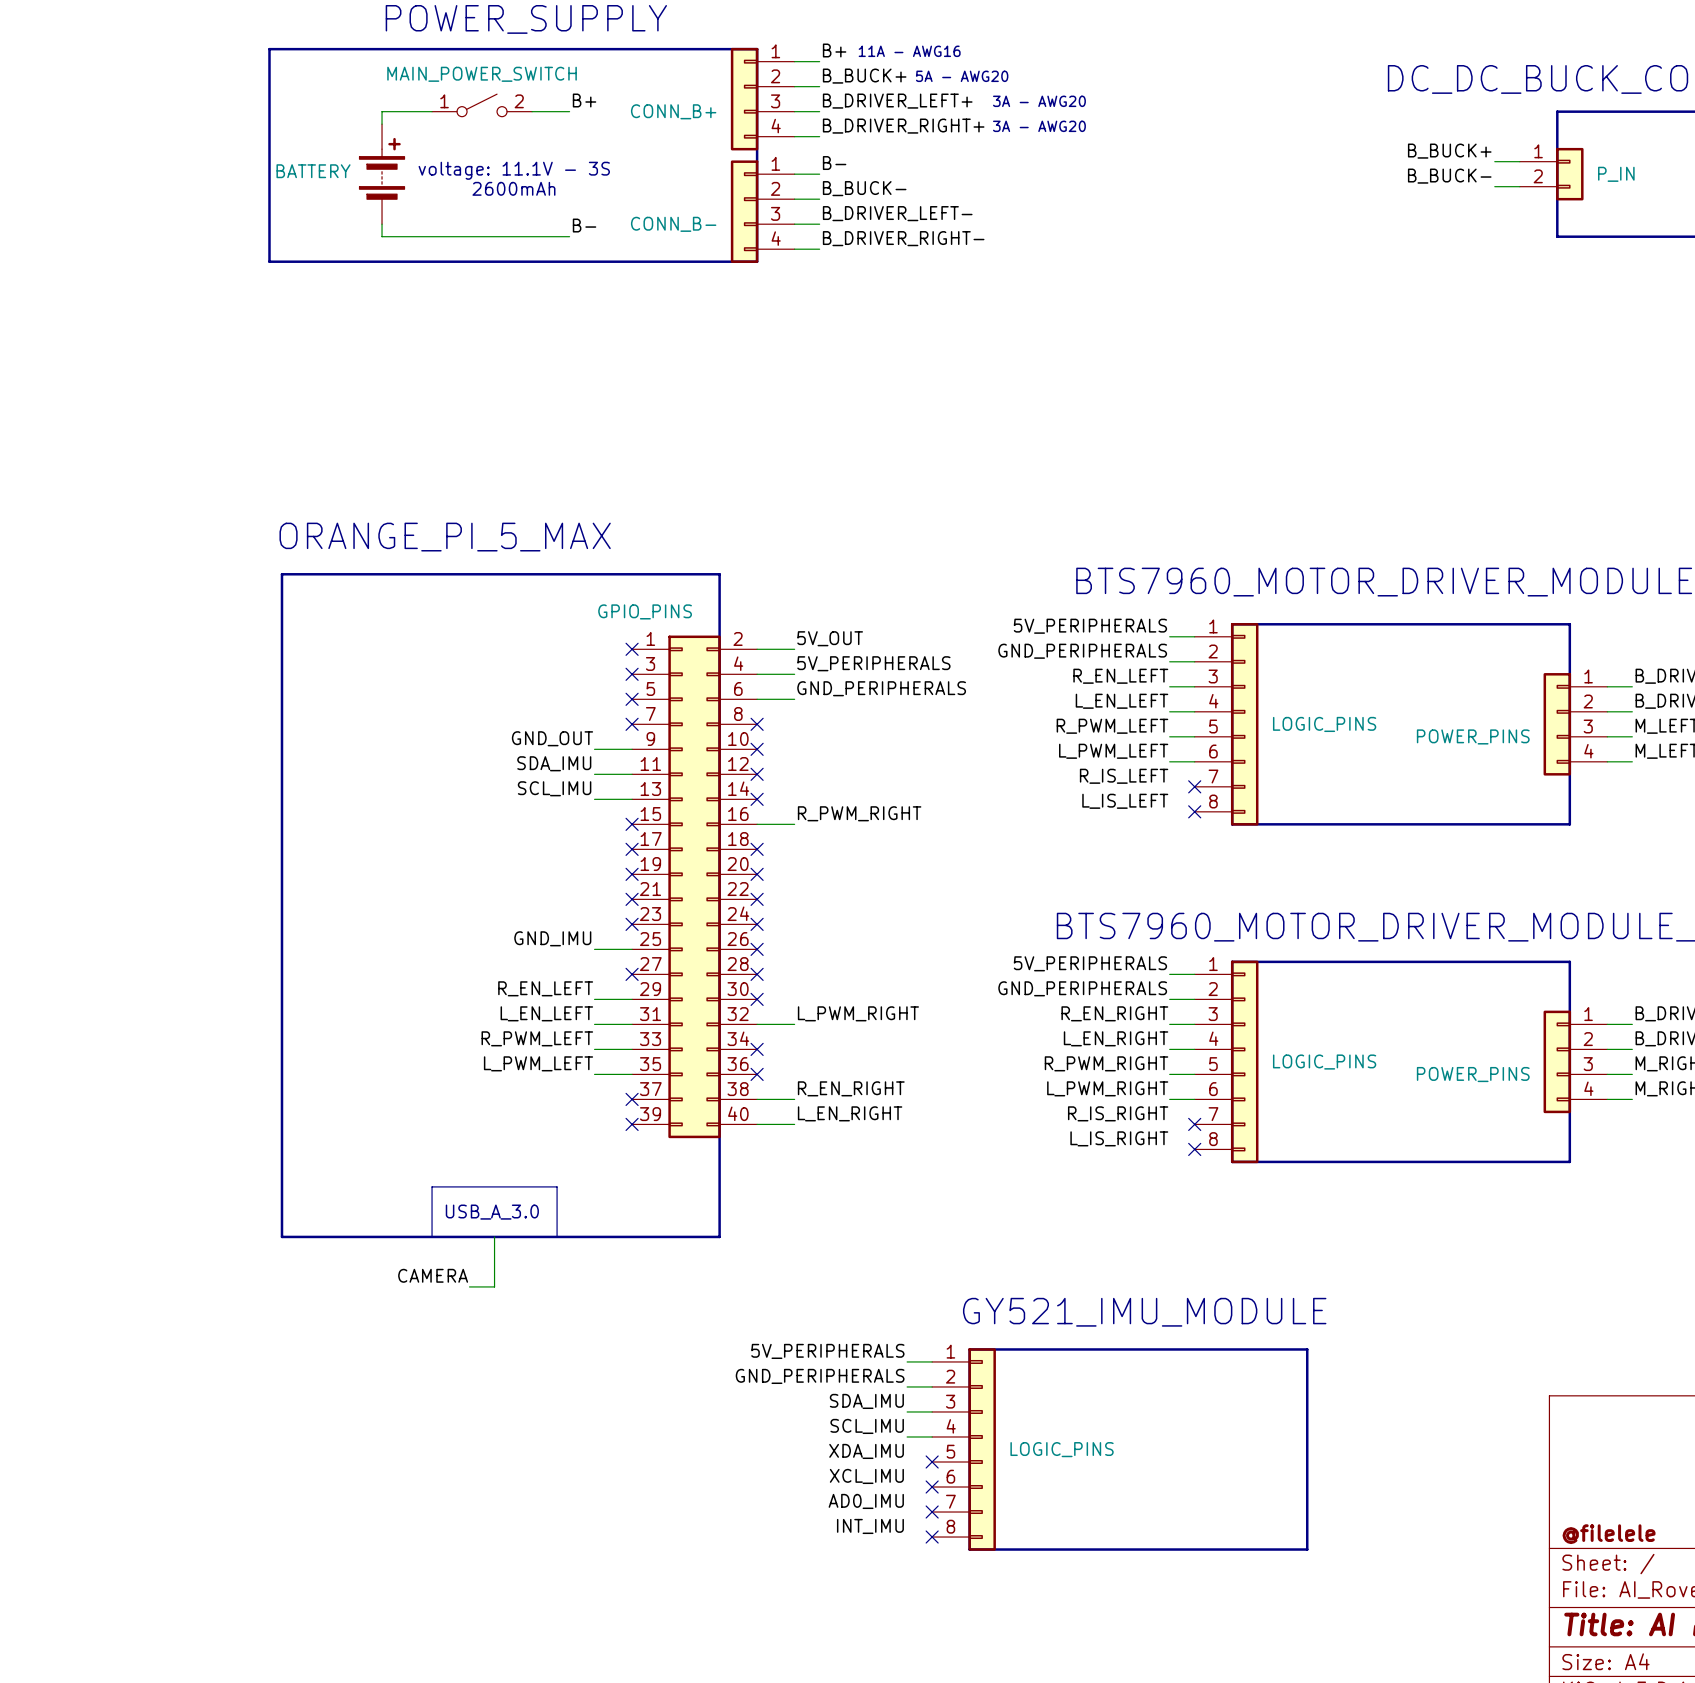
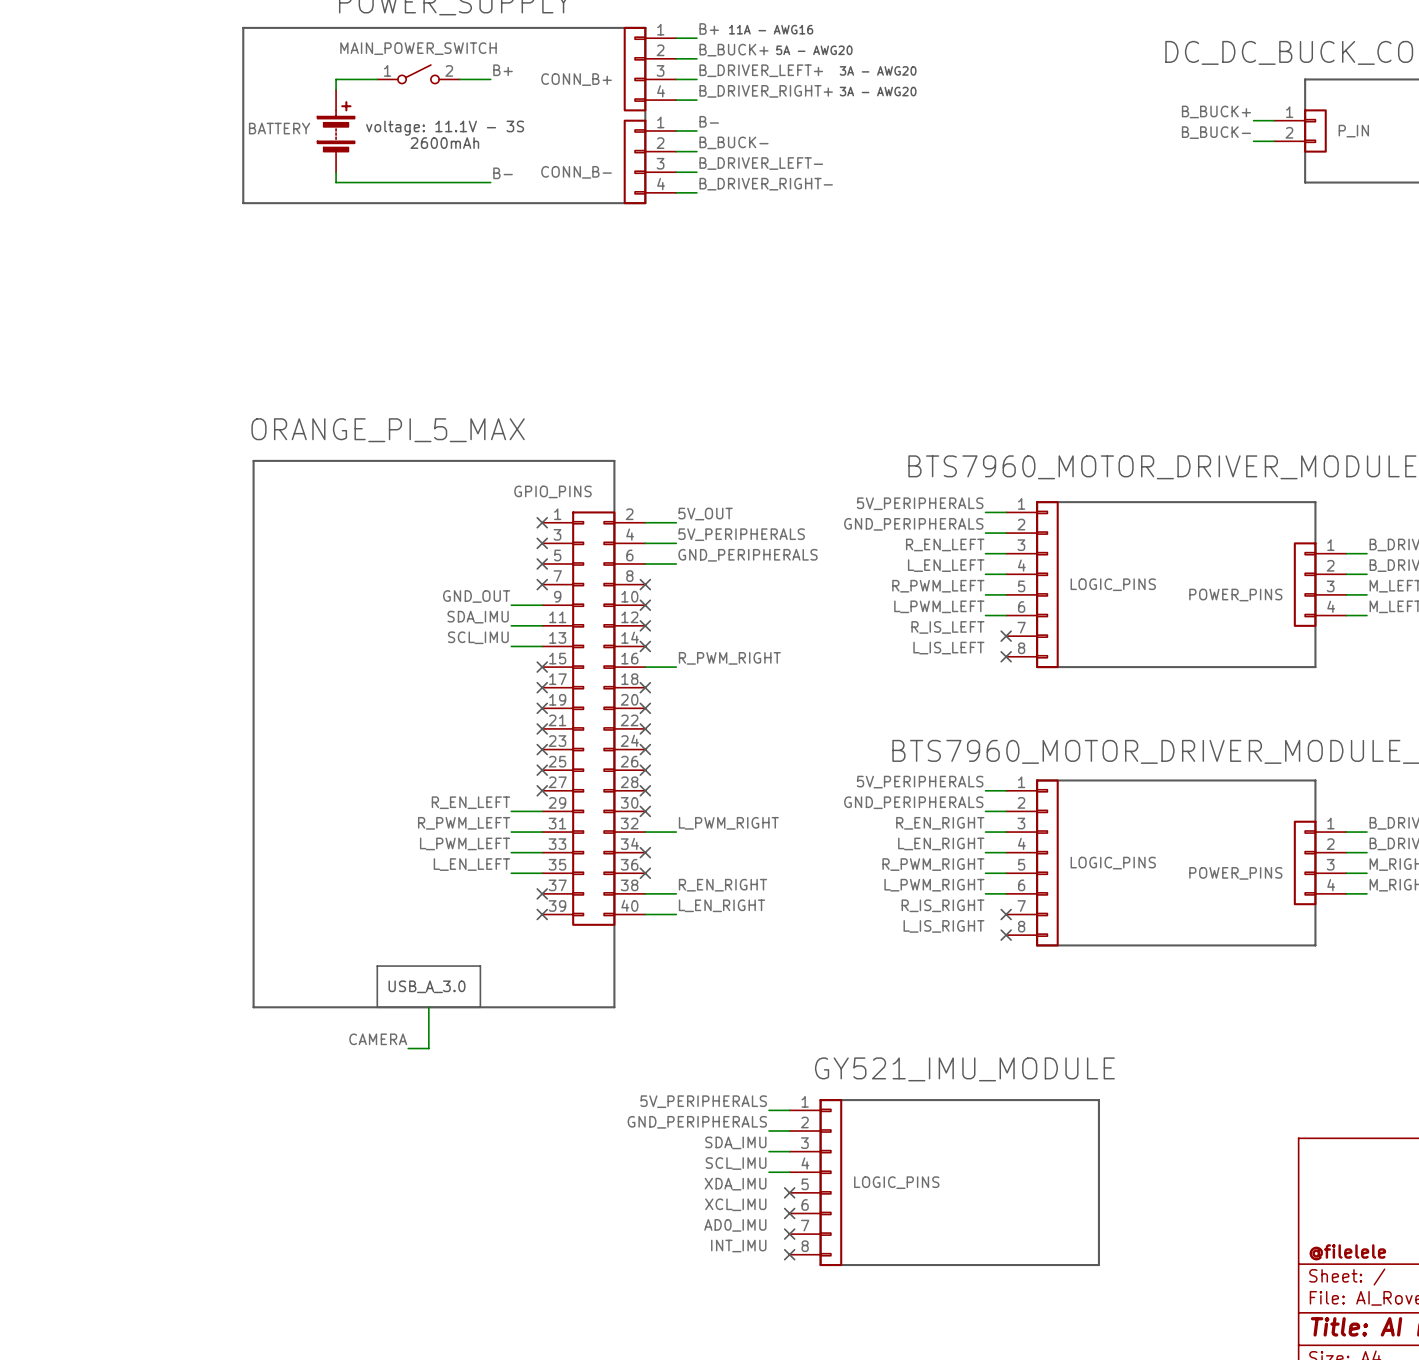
label: GND_IMU (552, 938) -> none
wire: (594, 949) (632, 949) -> none
no-connect mark: none -> (542, 770)
label: L_EN_LEFT (546, 1013) -> R_PWM_LEFT (464, 823)
label: R_PWM_LEFT (537, 1038) -> L_PWM_LEFT (465, 843)
label: L_PWM_LEFT (538, 1063) -> L_EN_LEFT (471, 864)

